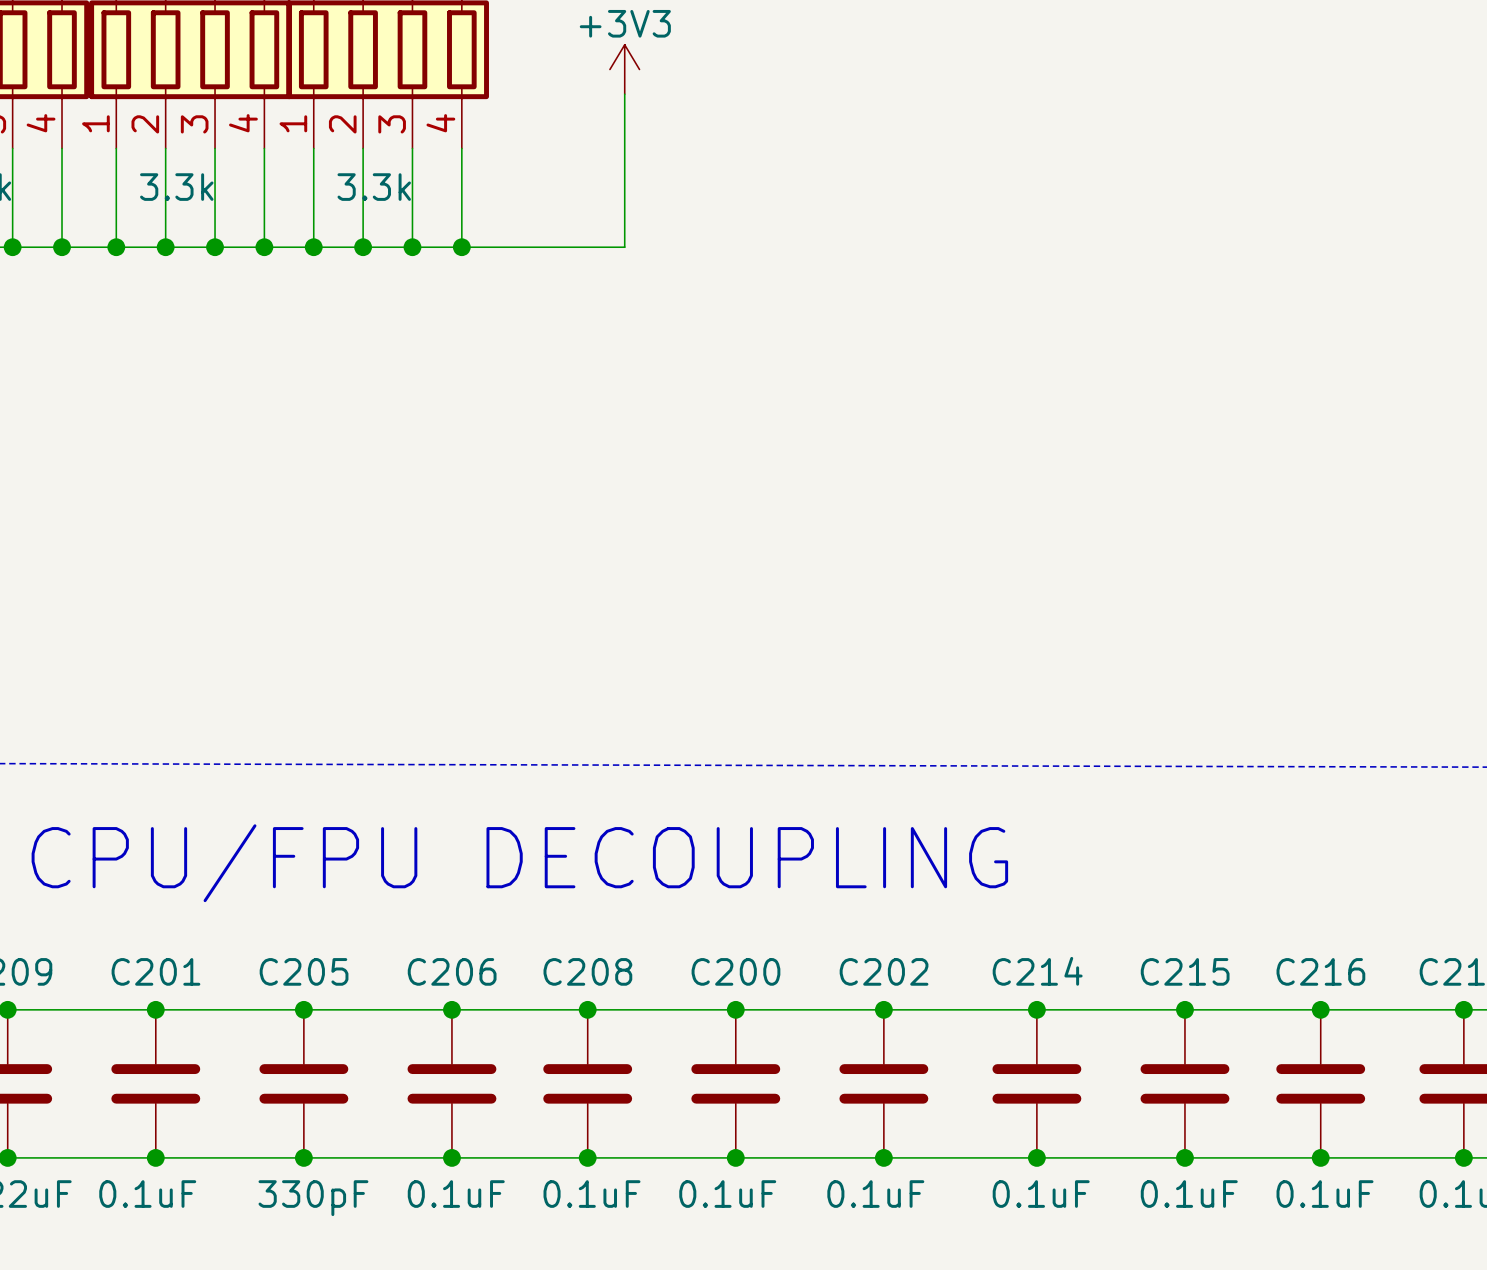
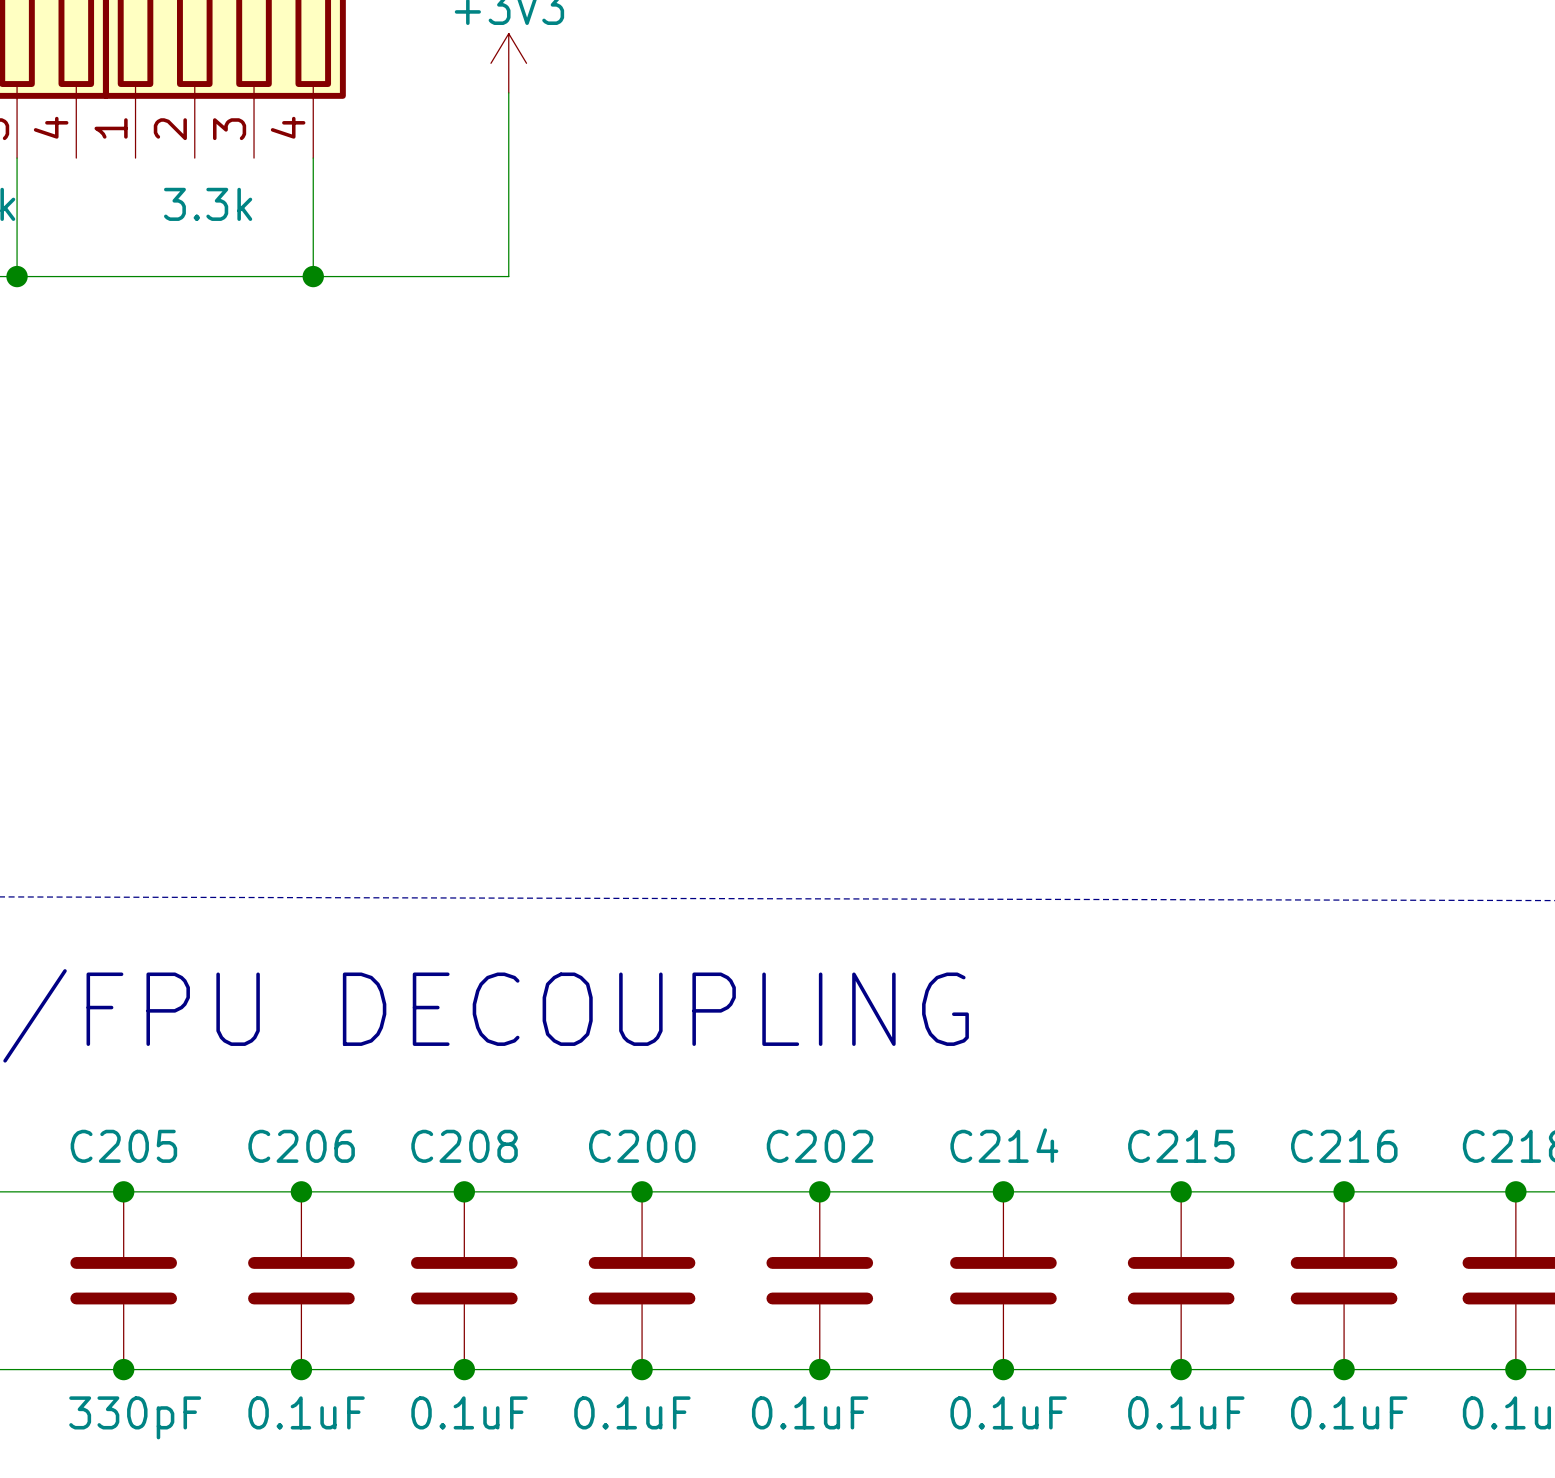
wire: (264, 148) (264, 247) -> none
wire: (313, 148) (313, 247) -> none
wire: (363, 148) (363, 247) -> none
wire: (412, 148) (412, 247) -> none
junction: (264, 247) -> none
junction: (313, 247) -> none
junction: (363, 247) -> none
junction: (412, 247) -> none

